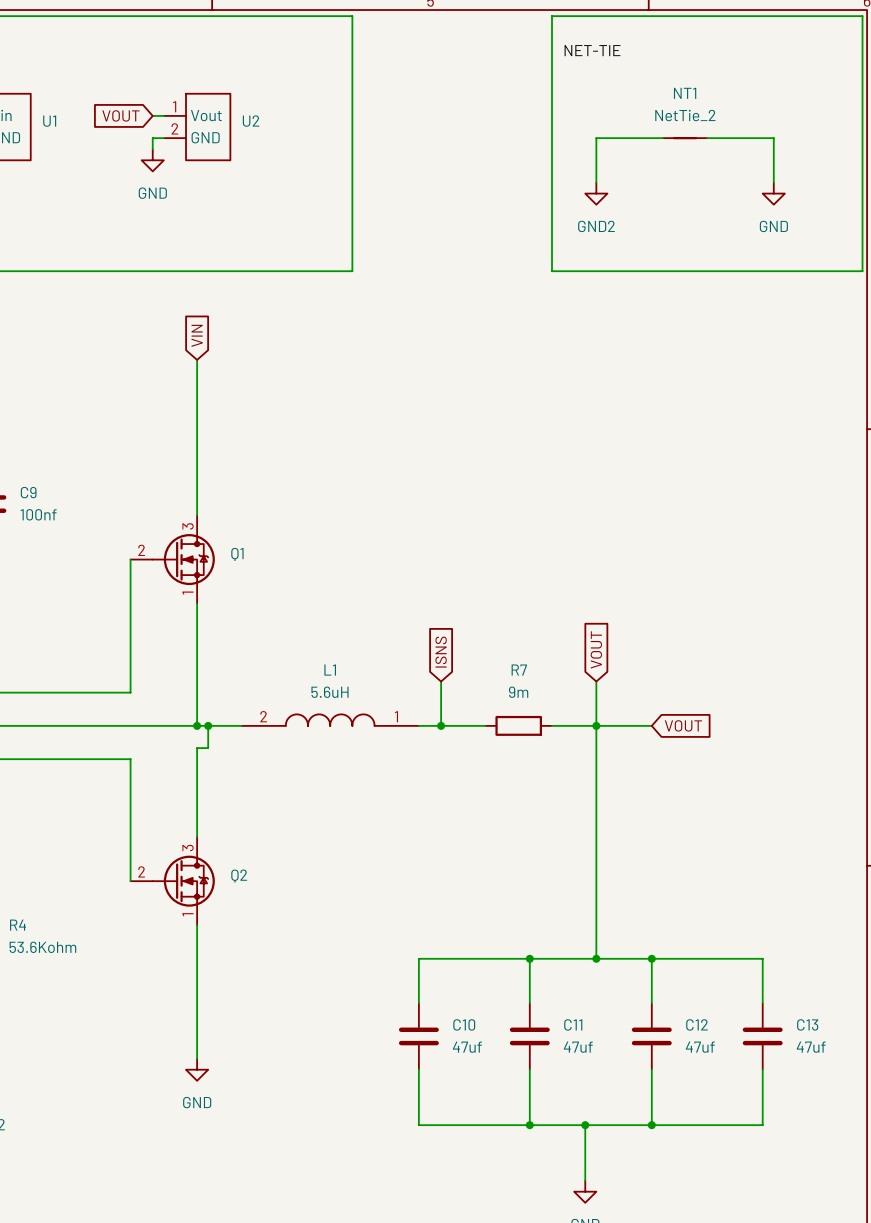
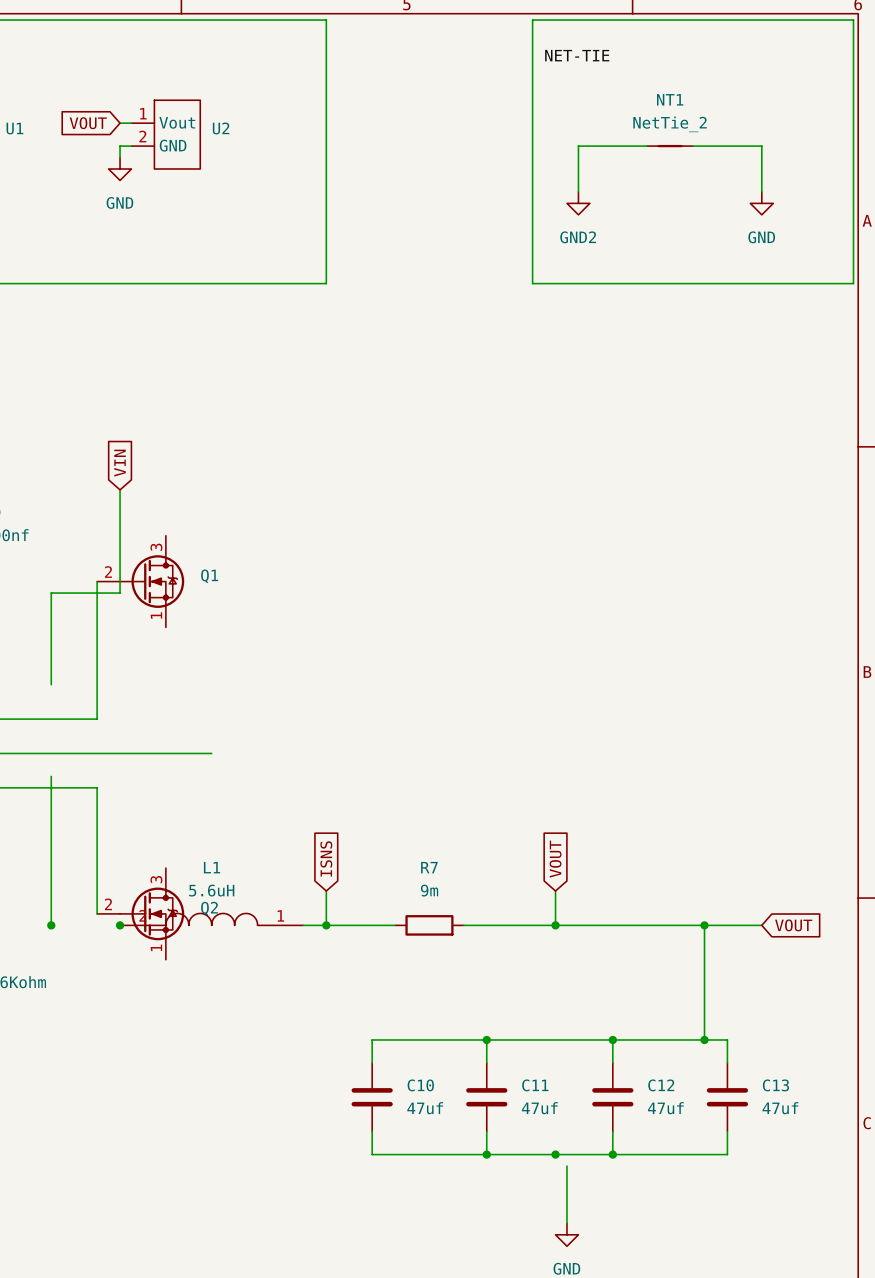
global label position: VIN (197, 335) -> VIN (120, 463)
wire: (197, 359) (197, 515) -> none
wire: none -> (120, 489) (120, 593) (51, 593) (51, 684)
wire: (197, 603) (197, 725) -> none
global label: VOUT (596, 649) -> none
global label position: ISNS (441, 652) -> ISNS (326, 858)
wire: (441, 681) (441, 725) -> none
wire: (596, 681) (596, 958) -> none
L1 position: (330, 720) -> (211, 919)
junction: (197, 725) -> none
wire: (208, 725) (208, 748) (197, 748) (197, 836) -> none
junction: (208, 725) -> none
wire: (418, 725) (485, 725) -> none
junction: (441, 725) -> none
R7 position: (518, 725) -> (429, 925)
wire: (551, 725) (651, 725) -> none
junction: (596, 725) -> none
global label: VOUT (683, 725) -> none
wire: none -> (51, 776) (51, 925)
global label: none -> VOUT (555, 859)
wire: none -> (326, 891) (326, 925)
wire: none -> (555, 891) (555, 925)
junction: none -> (51, 925)
junction: none -> (120, 925)
wire: none -> (303, 925) (395, 925)
junction: none -> (326, 925)
wire: none -> (463, 925) (761, 925)
junction: none -> (555, 925)
wire: none -> (704, 925) (704, 1039)
junction: none -> (704, 925)
global label: none -> VOUT (793, 925)
wire: (197, 925) (197, 1058) -> none
wire: (529, 958) (529, 1003) -> none
junction: (529, 958) -> none
junction: (596, 958) -> none
wire: (651, 958) (651, 1003) -> none
junction: (651, 958) -> none
wire: (418, 1003) (418, 958) (762, 958) (762, 1003) -> none
wire: none -> (486, 1039) (486, 1062)
junction: none -> (486, 1039)
wire: none -> (612, 1039) (612, 1062)
junction: none -> (612, 1039)
junction: none -> (704, 1039)
wire: none -> (372, 1062) (372, 1039) (727, 1039) (727, 1062)
C10 position: (418, 1036) -> (372, 1097)
C11 position: (529, 1036) -> (486, 1097)
C12 position: (651, 1036) -> (612, 1097)
C13 position: (762, 1036) -> (727, 1097)
power symbol: GND (197, 1069) -> none
wire: (418, 1069) (418, 1125) (762, 1125) (762, 1069) -> none
wire: (529, 1069) (529, 1125) -> none
wire: (651, 1069) (651, 1125) -> none
wire: none -> (372, 1131) (372, 1154) (727, 1154) (727, 1131)
wire: none -> (486, 1131) (486, 1154)
wire: none -> (612, 1131) (612, 1154)
junction: none -> (486, 1154)
junction: none -> (612, 1154)
junction: (529, 1125) -> none
junction position: (585, 1125) -> (555, 1154)
junction: (651, 1125) -> none

